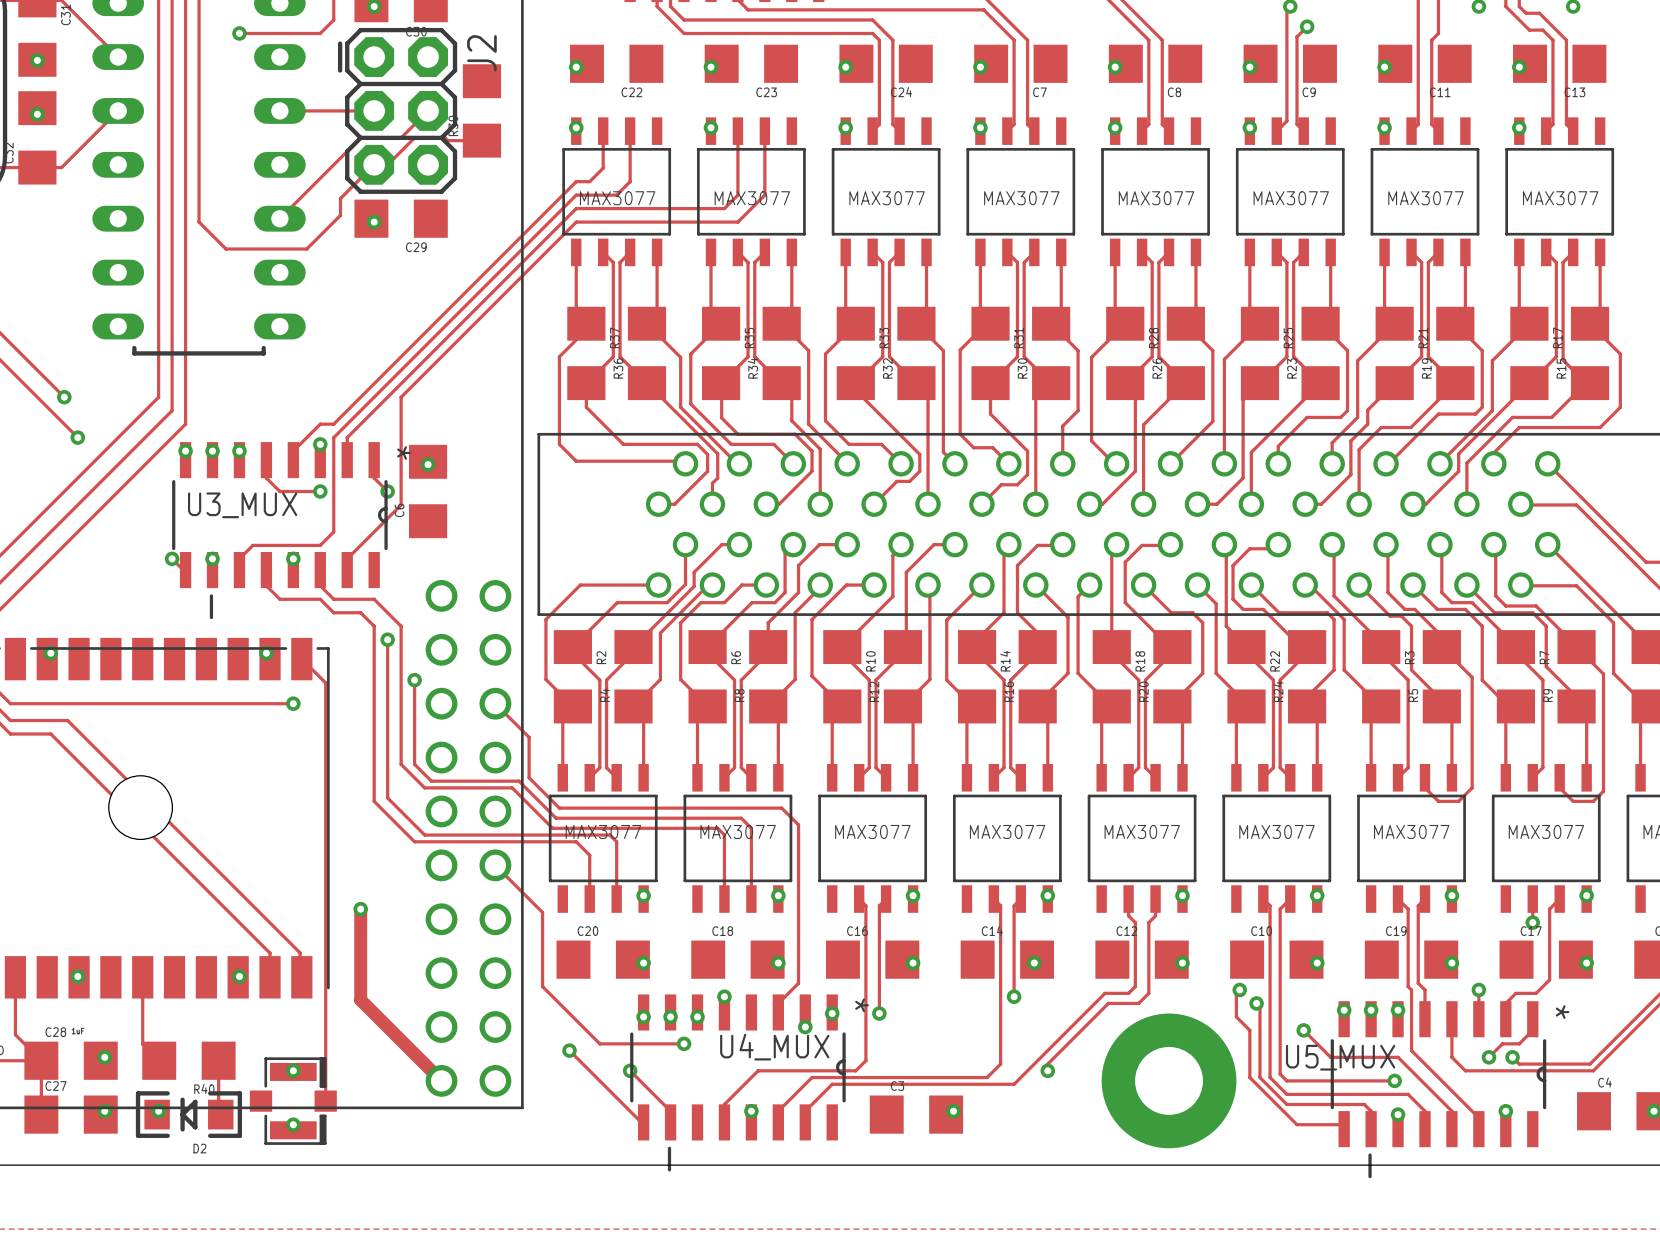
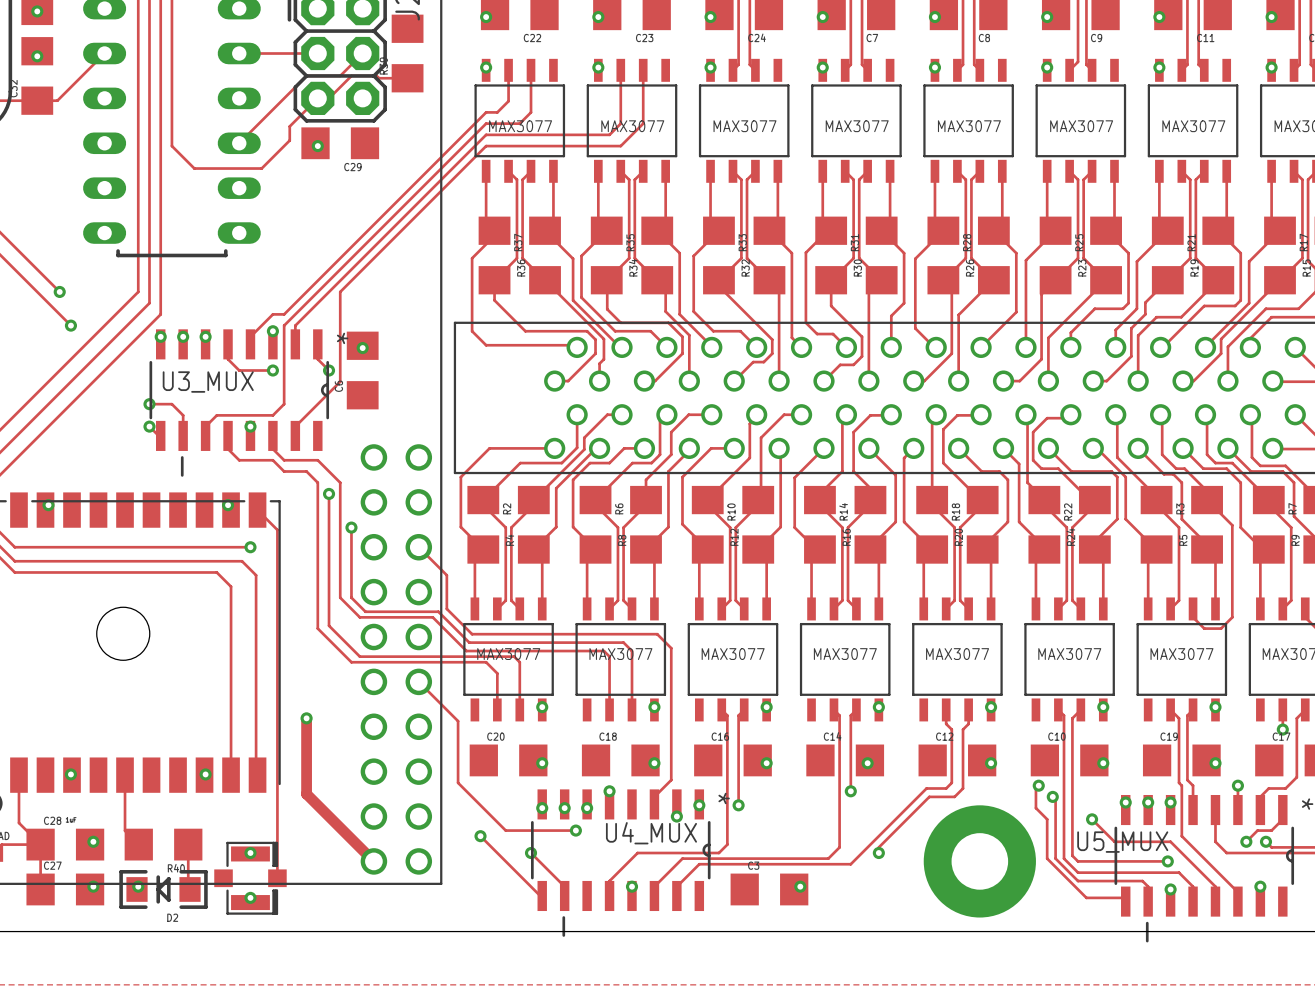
track: none -> (149, 404) (171, 404) (183, 415) (183, 426)
via position: (212, 558) -> (149, 404)
track: (67, 720) (300, 952) -> (62, 561) (242, 561) (256, 575) (256, 754)
track: (50, 734) (270, 953) -> (48, 572) (216, 572) (231, 586) (231, 755)

